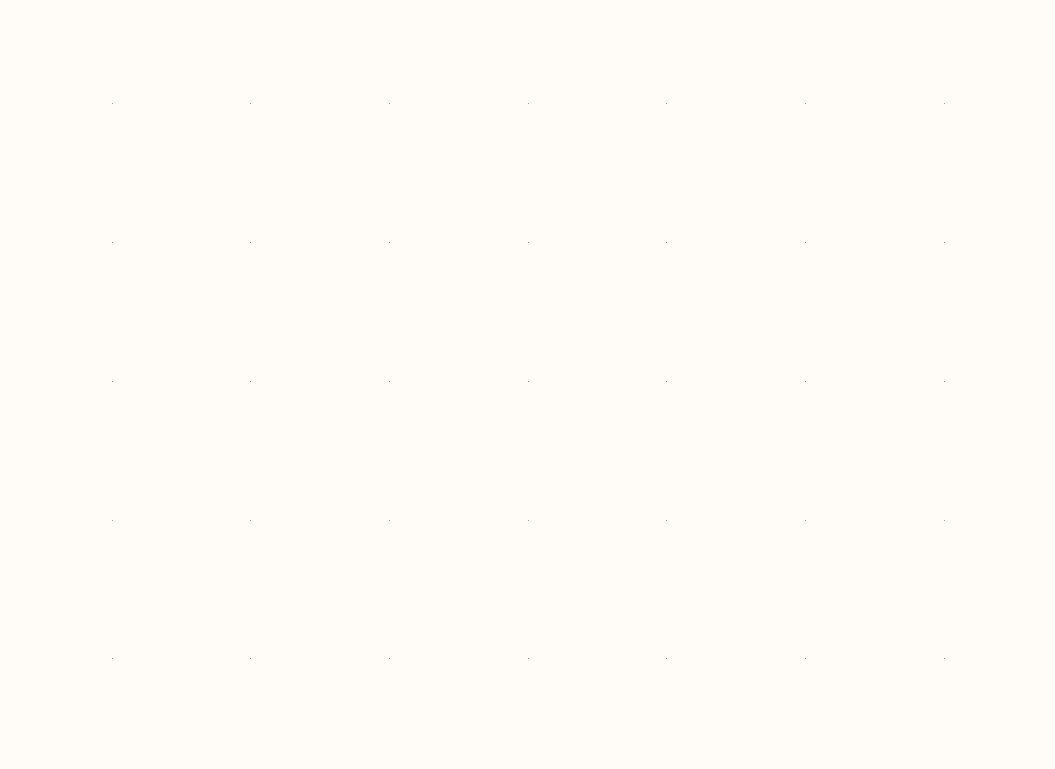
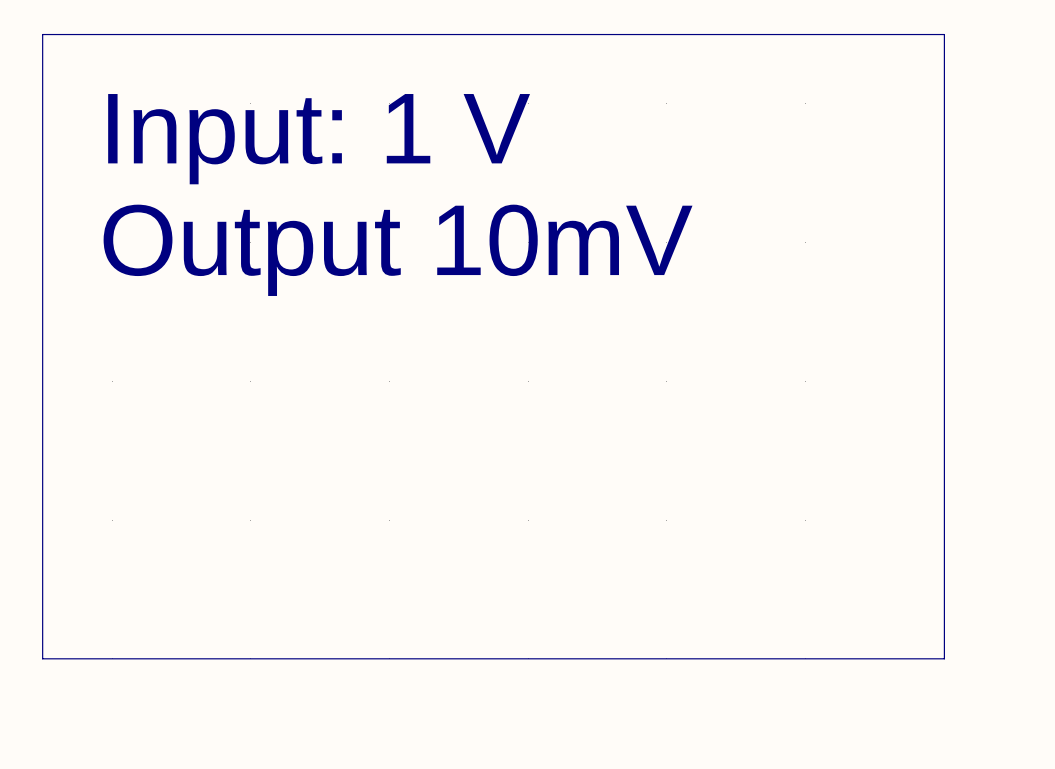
line: none -> (42, 34) (944, 34) (944, 658) (42, 658) (42, 34)
text: none -> Input: 1 V (319, 139)
text: none -> Output 10mV (398, 250)

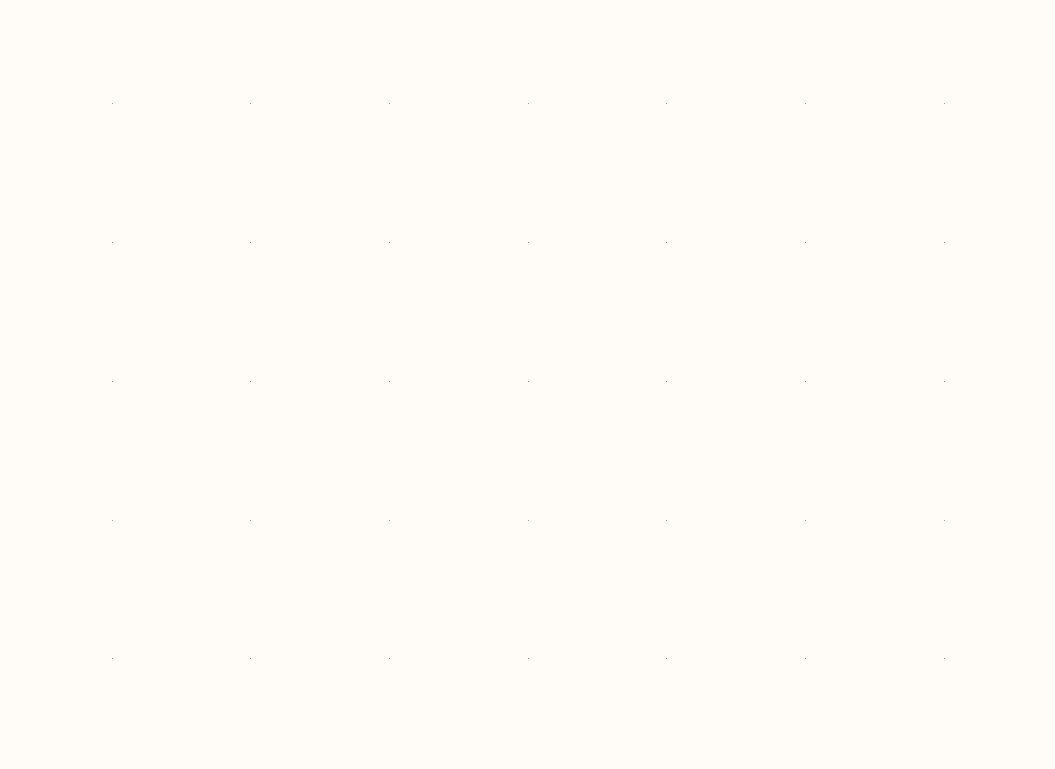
line: (42, 34) (944, 34) (944, 658) (42, 658) (42, 34) -> none
text: Input: 1 V (319, 139) -> none
text: Output 10mV (398, 250) -> none

